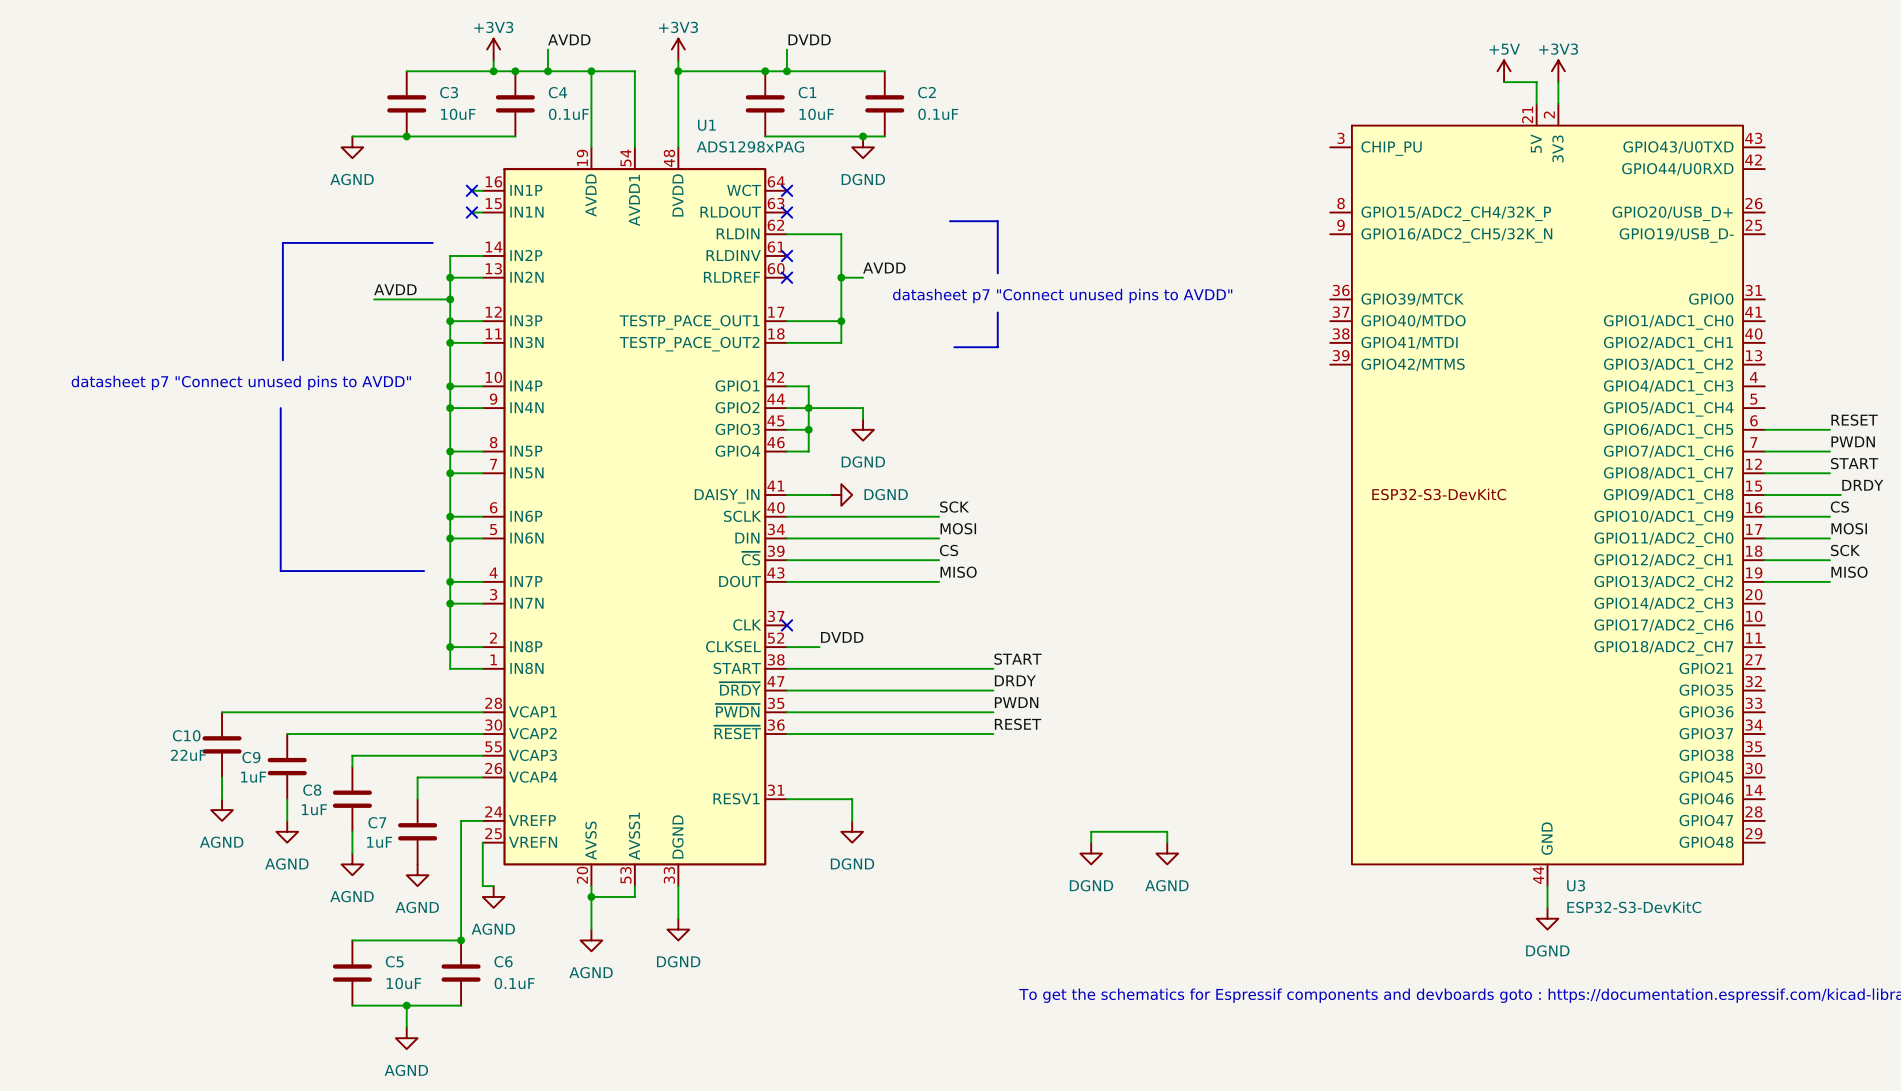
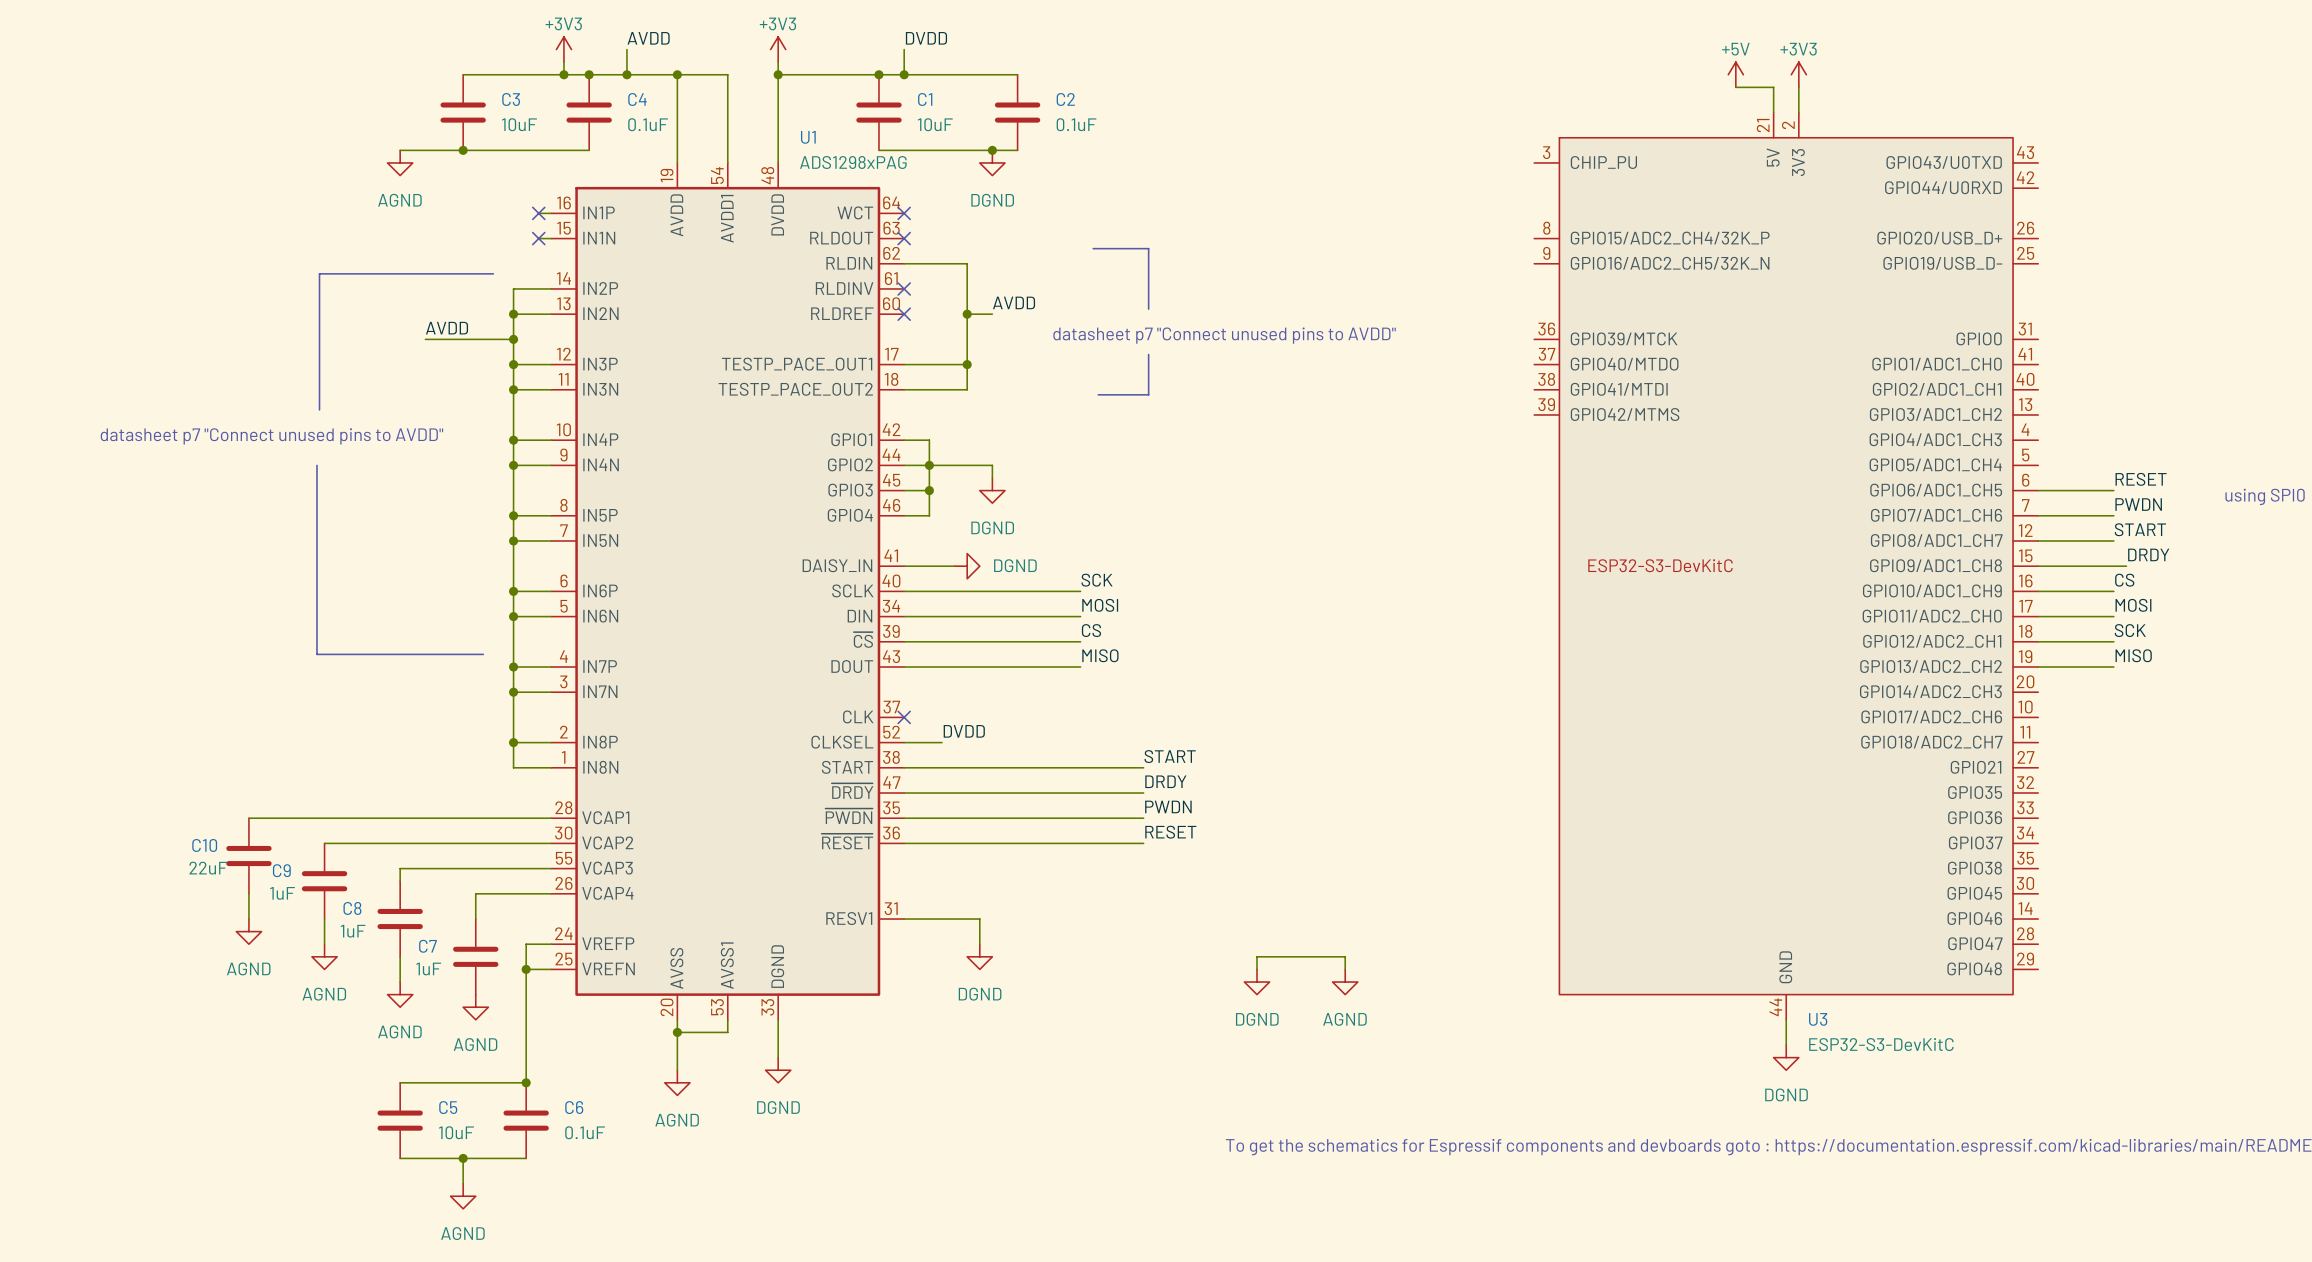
junction: none -> (526, 969)
wire: (482, 842) (482, 886) (493, 886) -> (551, 969) (526, 969)
power symbol: AGND (493, 896) -> none

